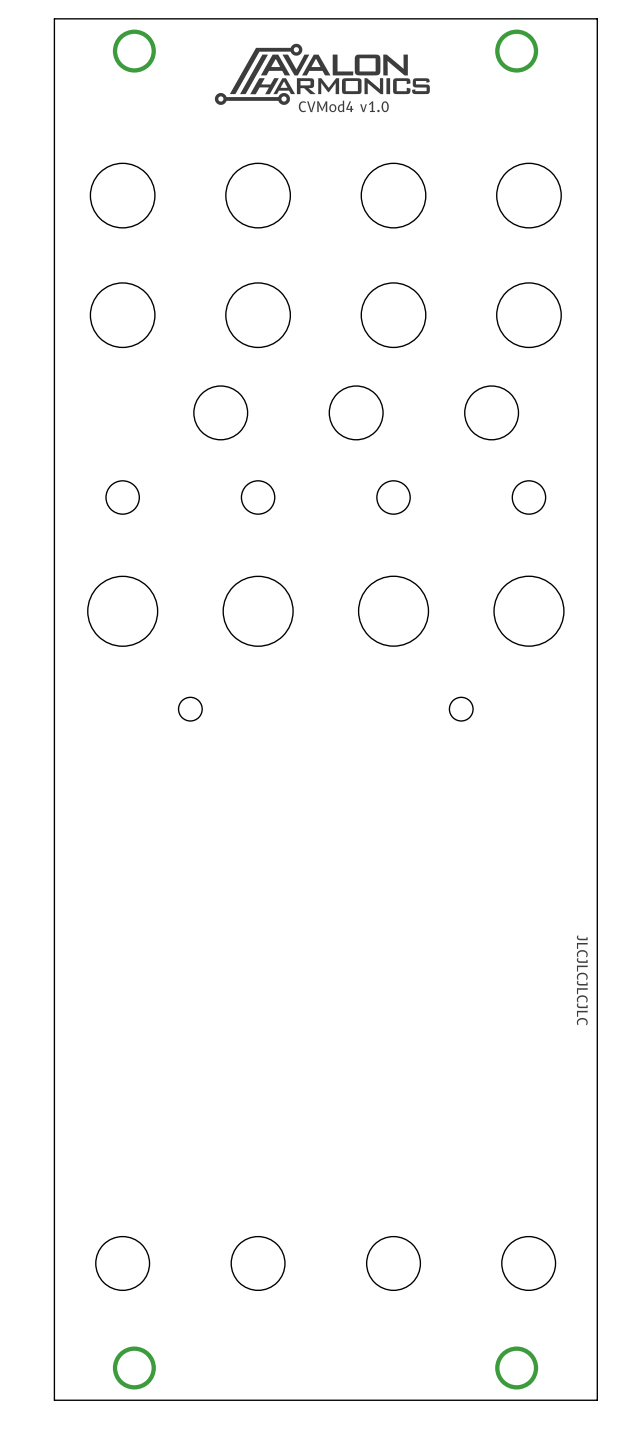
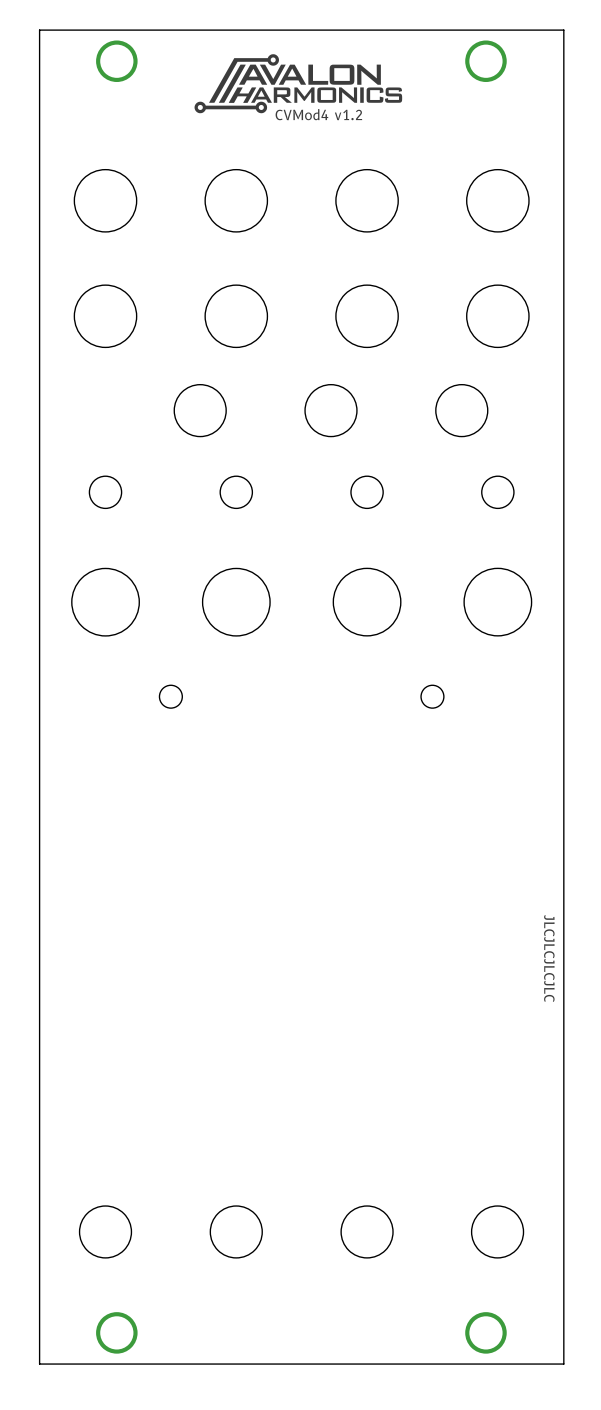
text: CVMod4 v1.0 (343, 106) -> CVMod4 v1.2 (318, 114)

